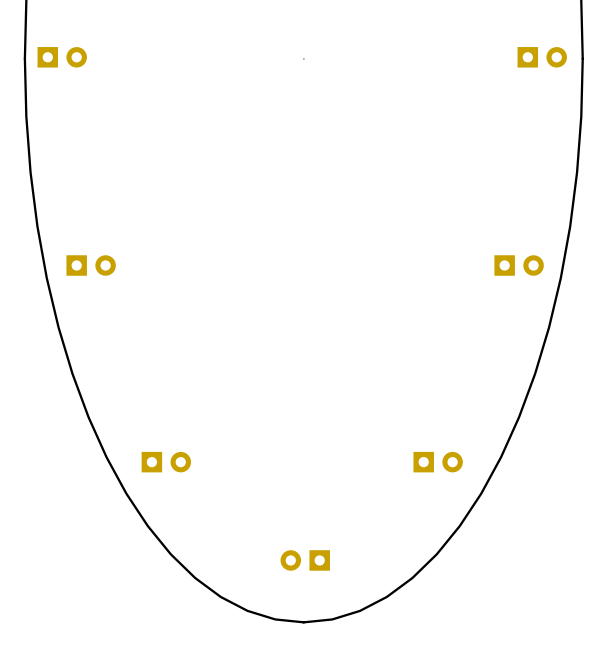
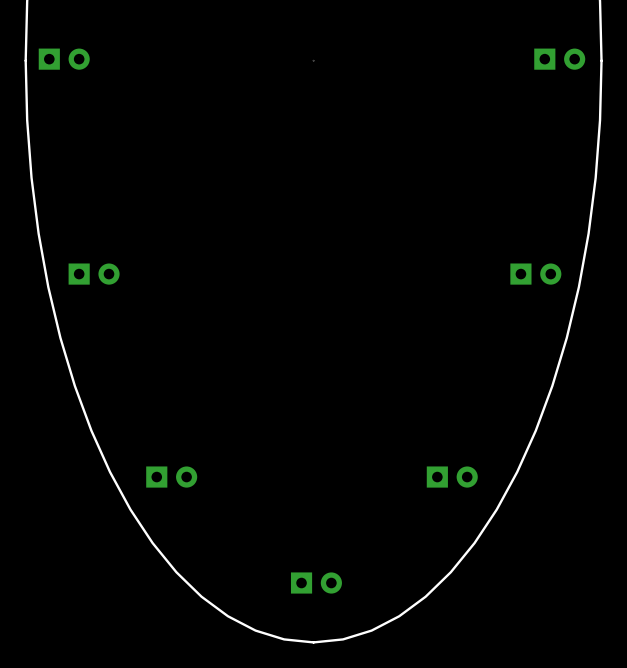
part rotation: 0° (305, 560) -> 180° (316, 583)

